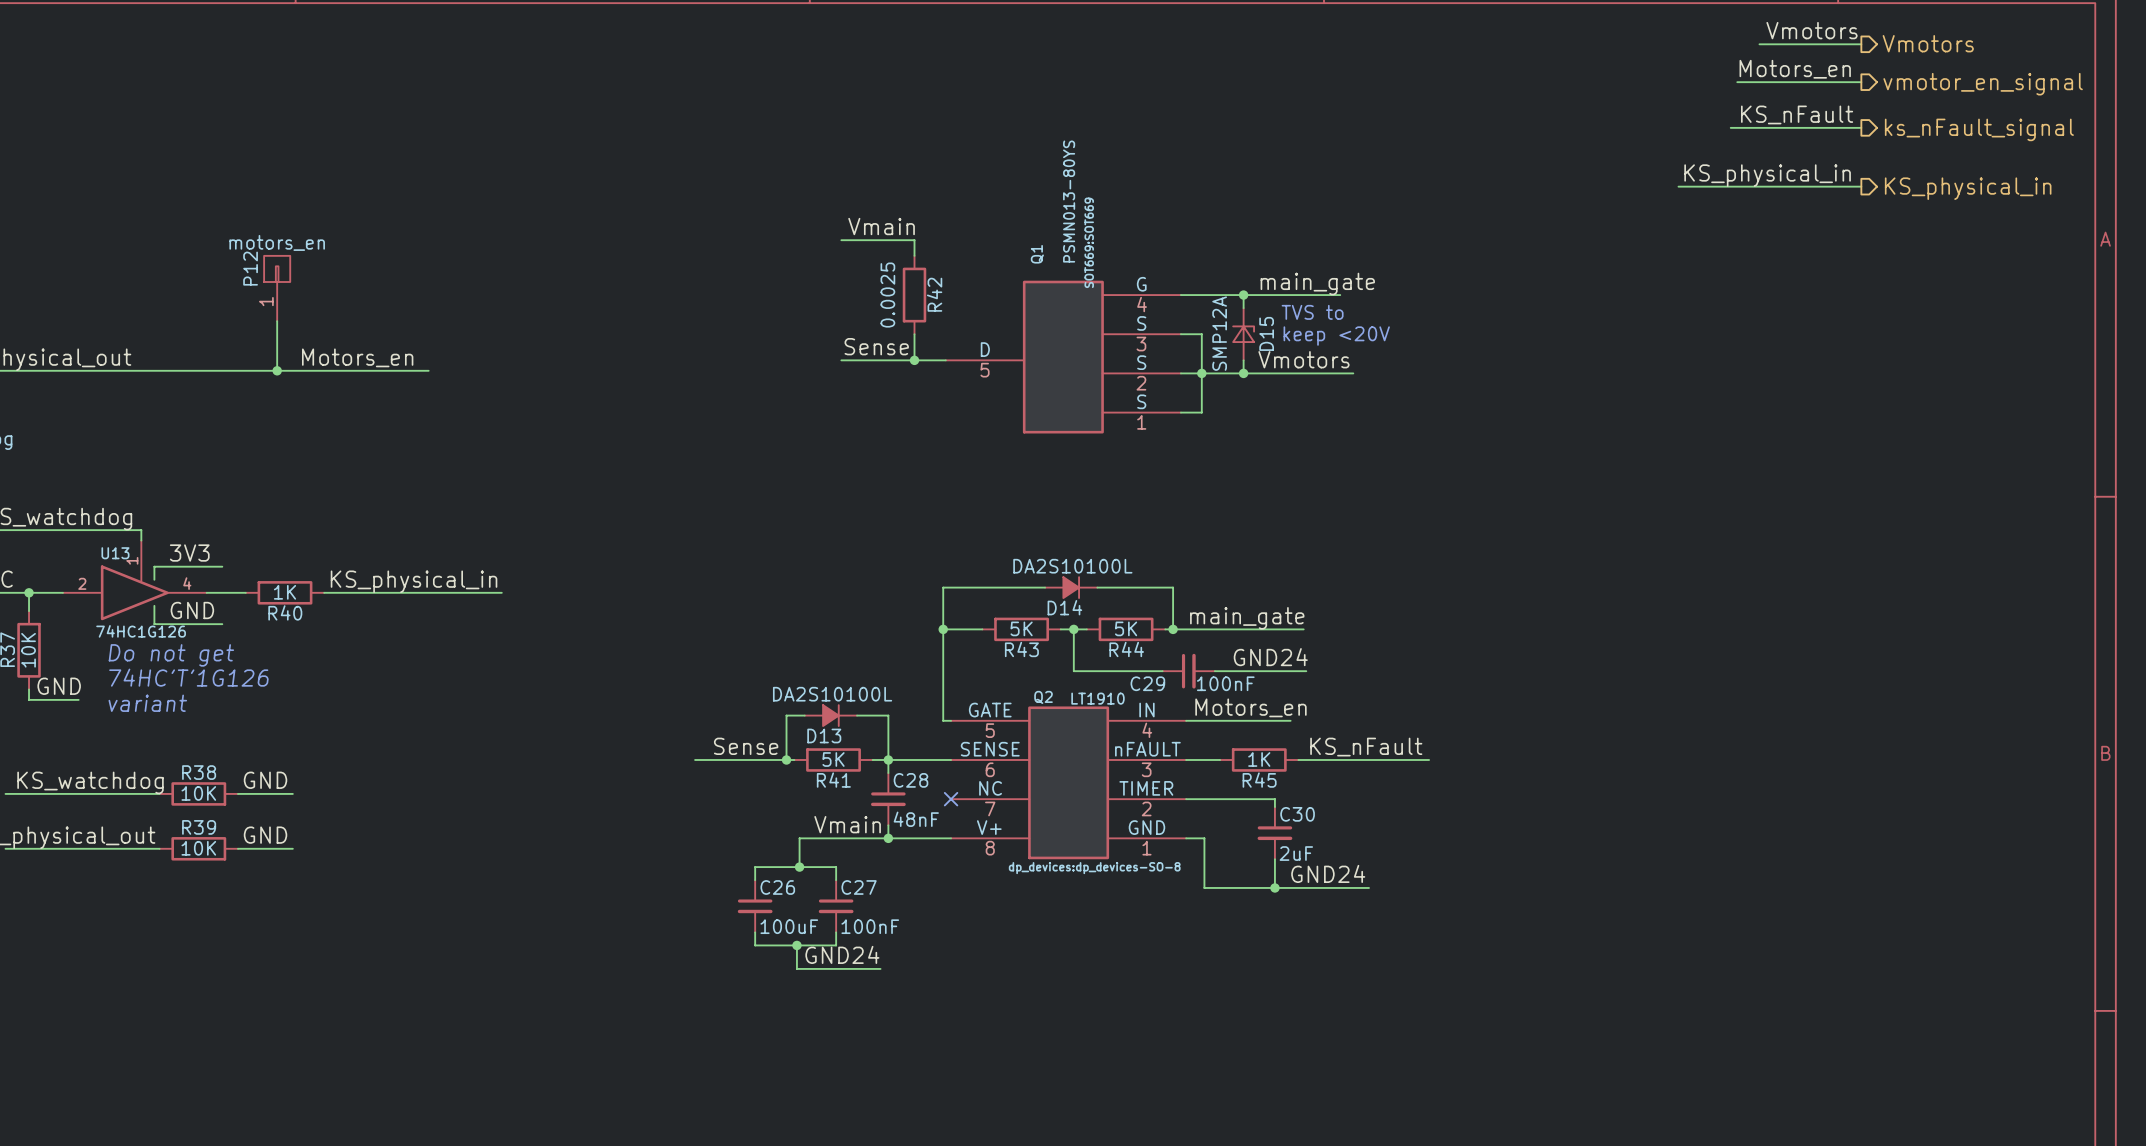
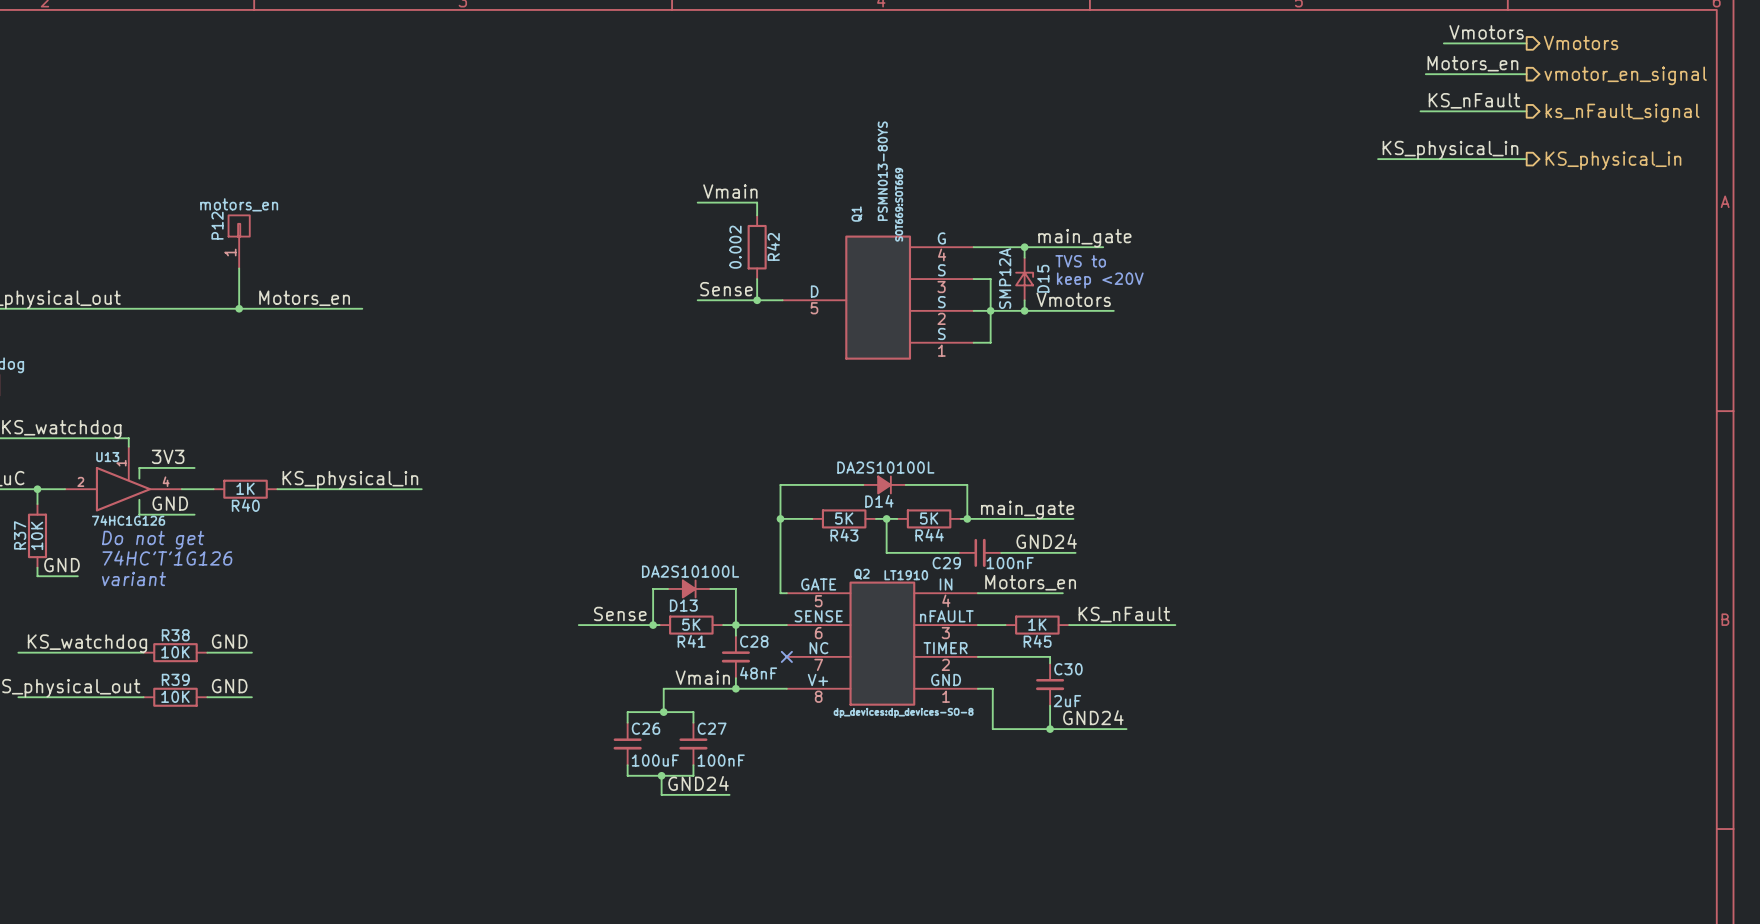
R42 value: 0.0025 (887, 295) -> 0.002 (735, 247)

